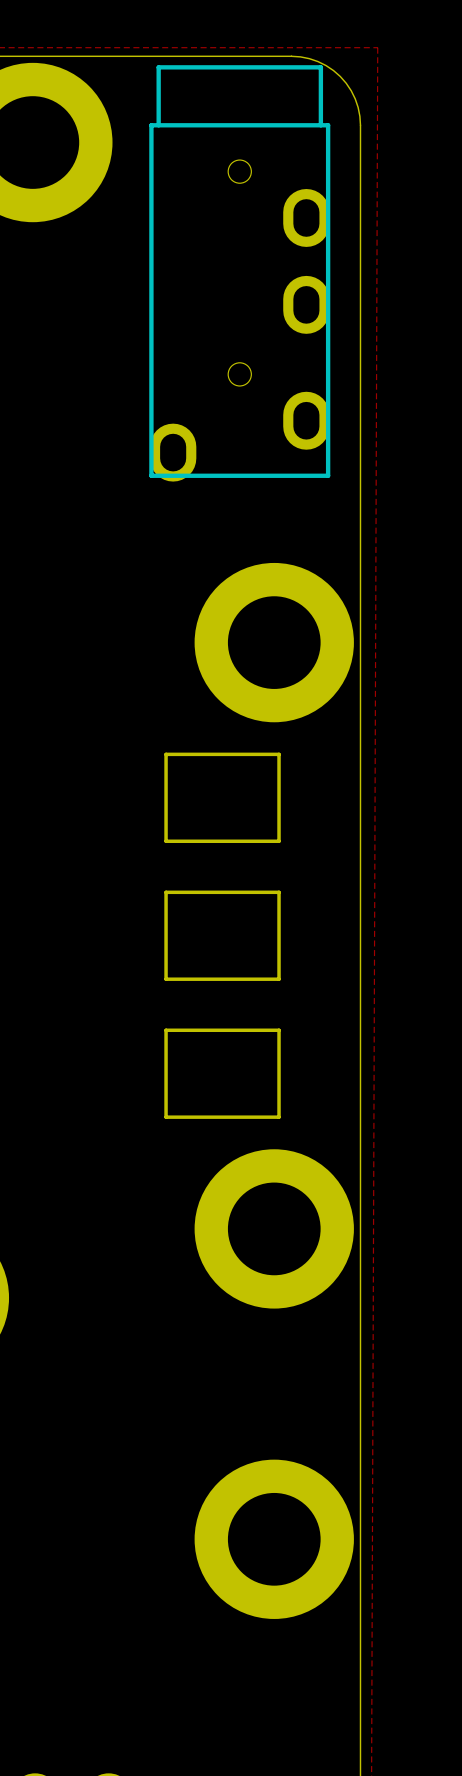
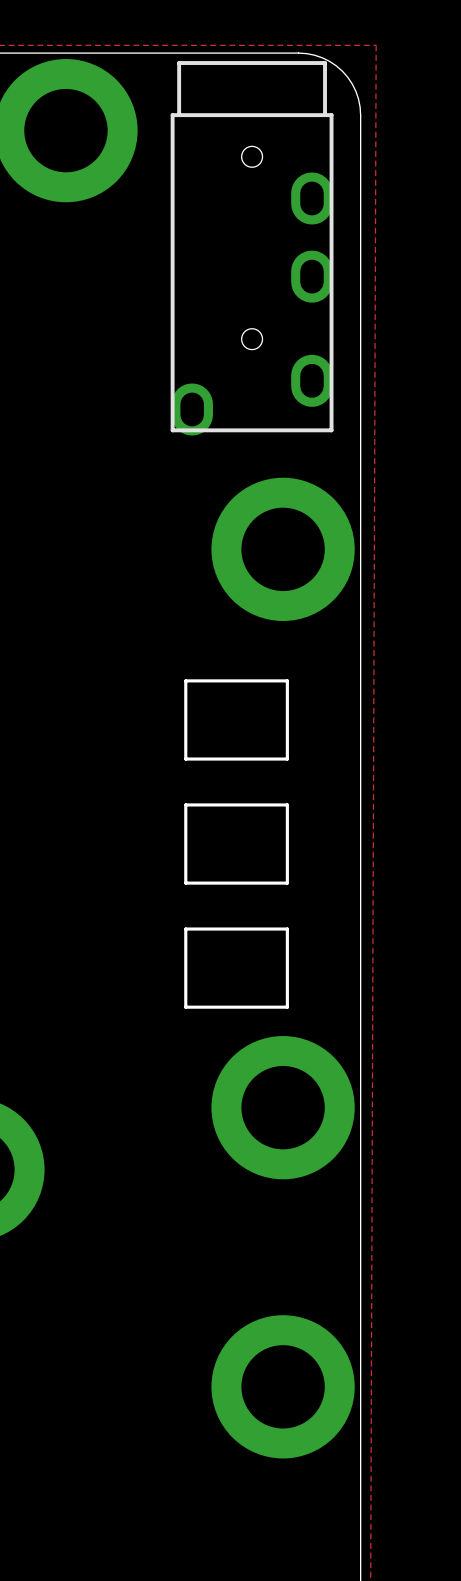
part position: (274, 642) -> (283, 549)

